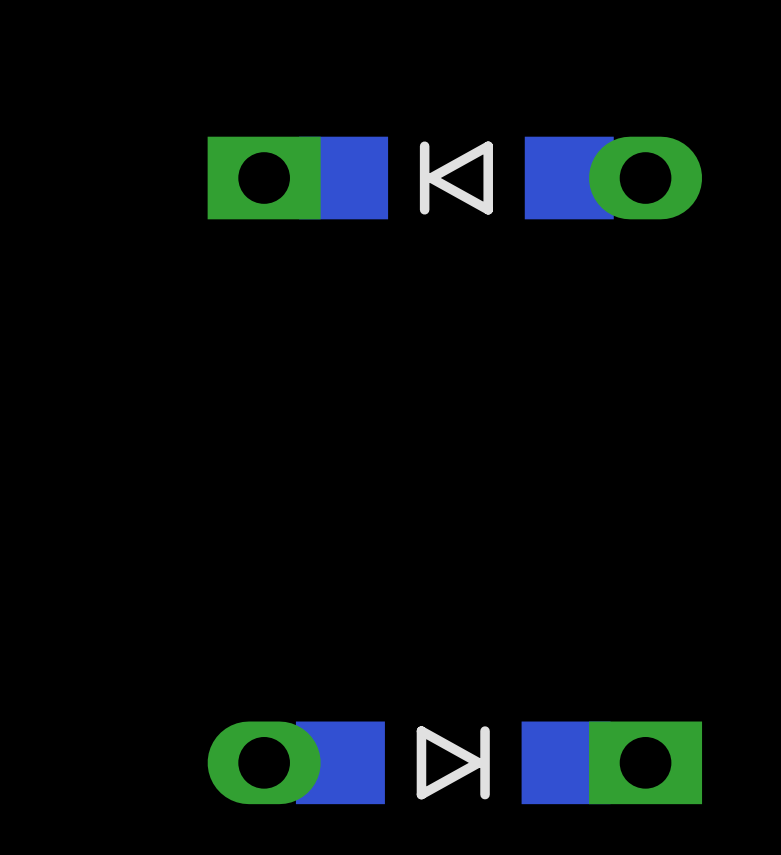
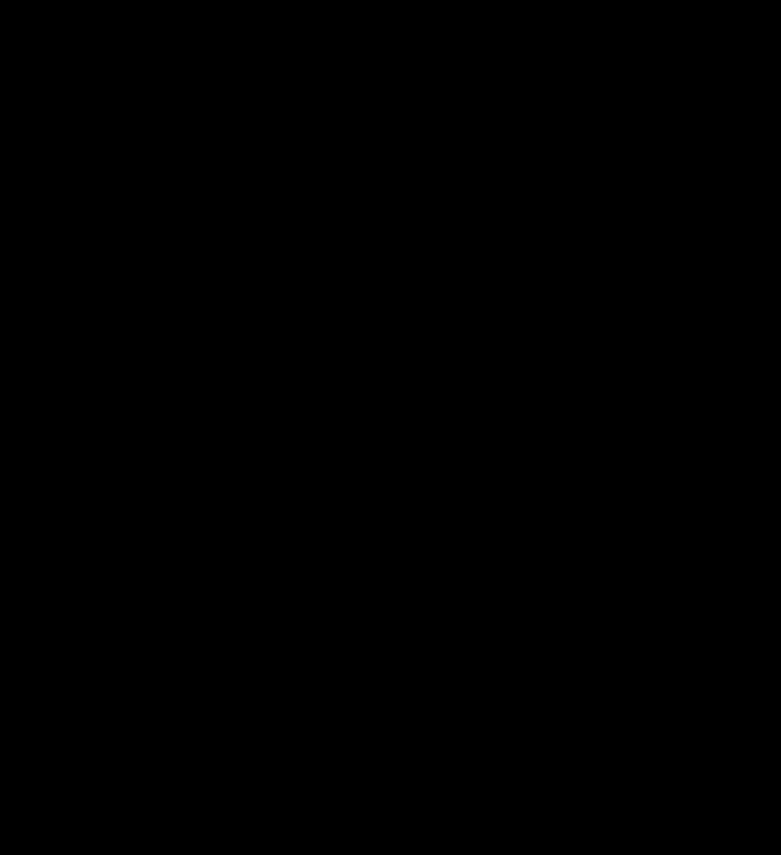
part: (454, 178) -> none
part: (454, 762) -> none

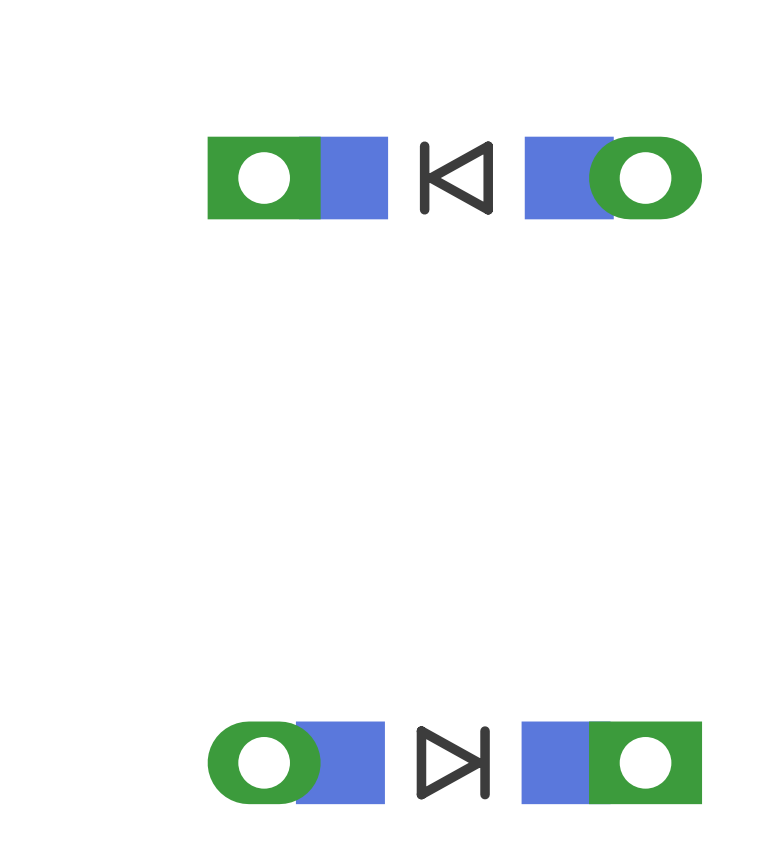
part: none -> (454, 178)
part: none -> (454, 762)

